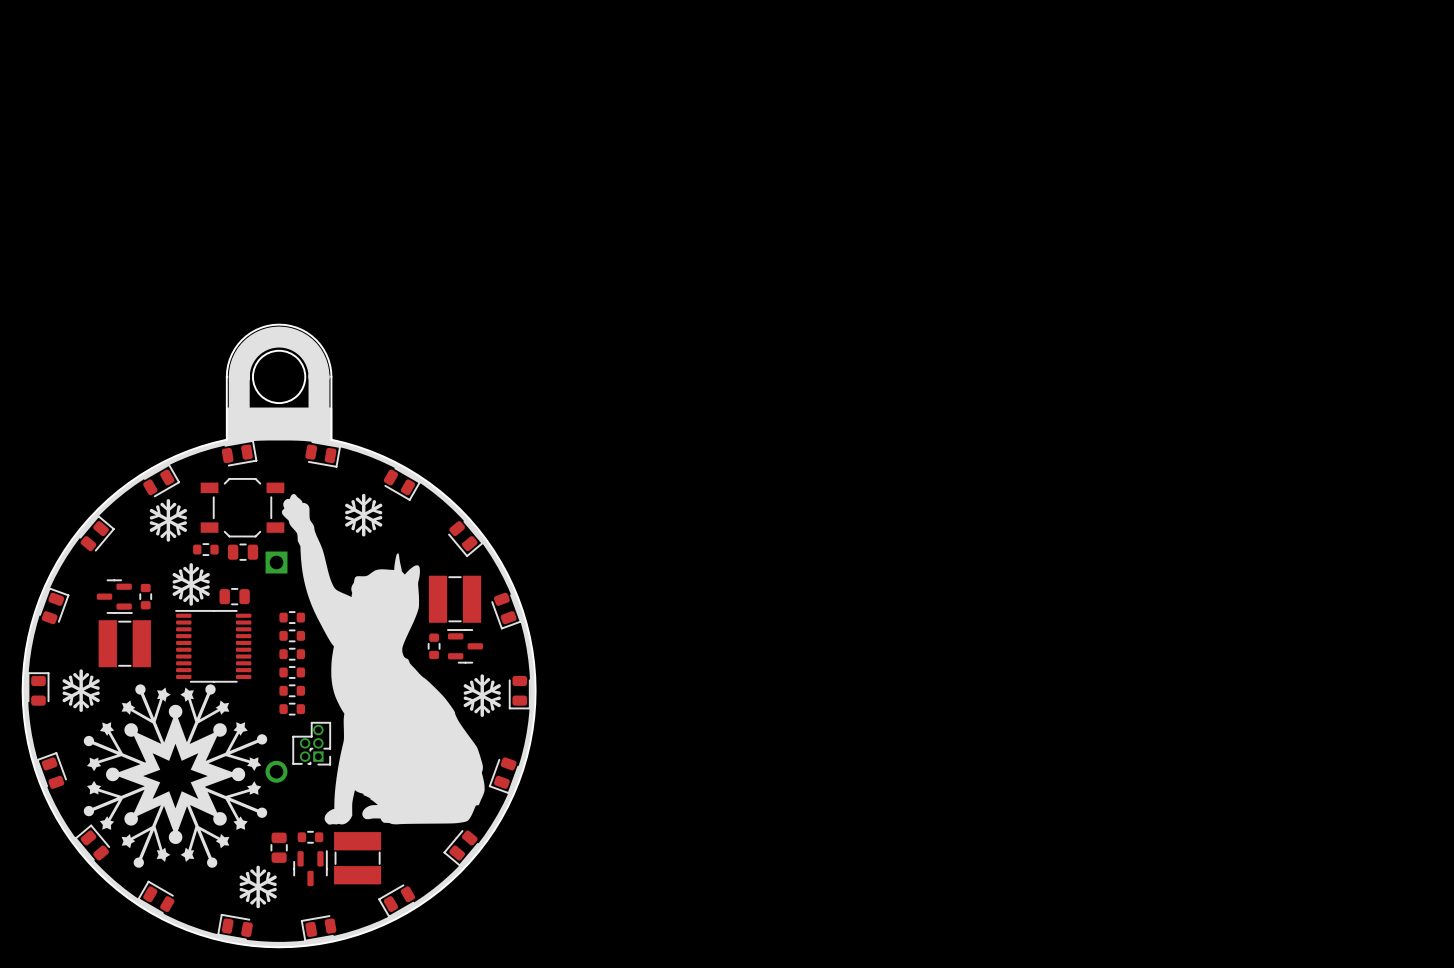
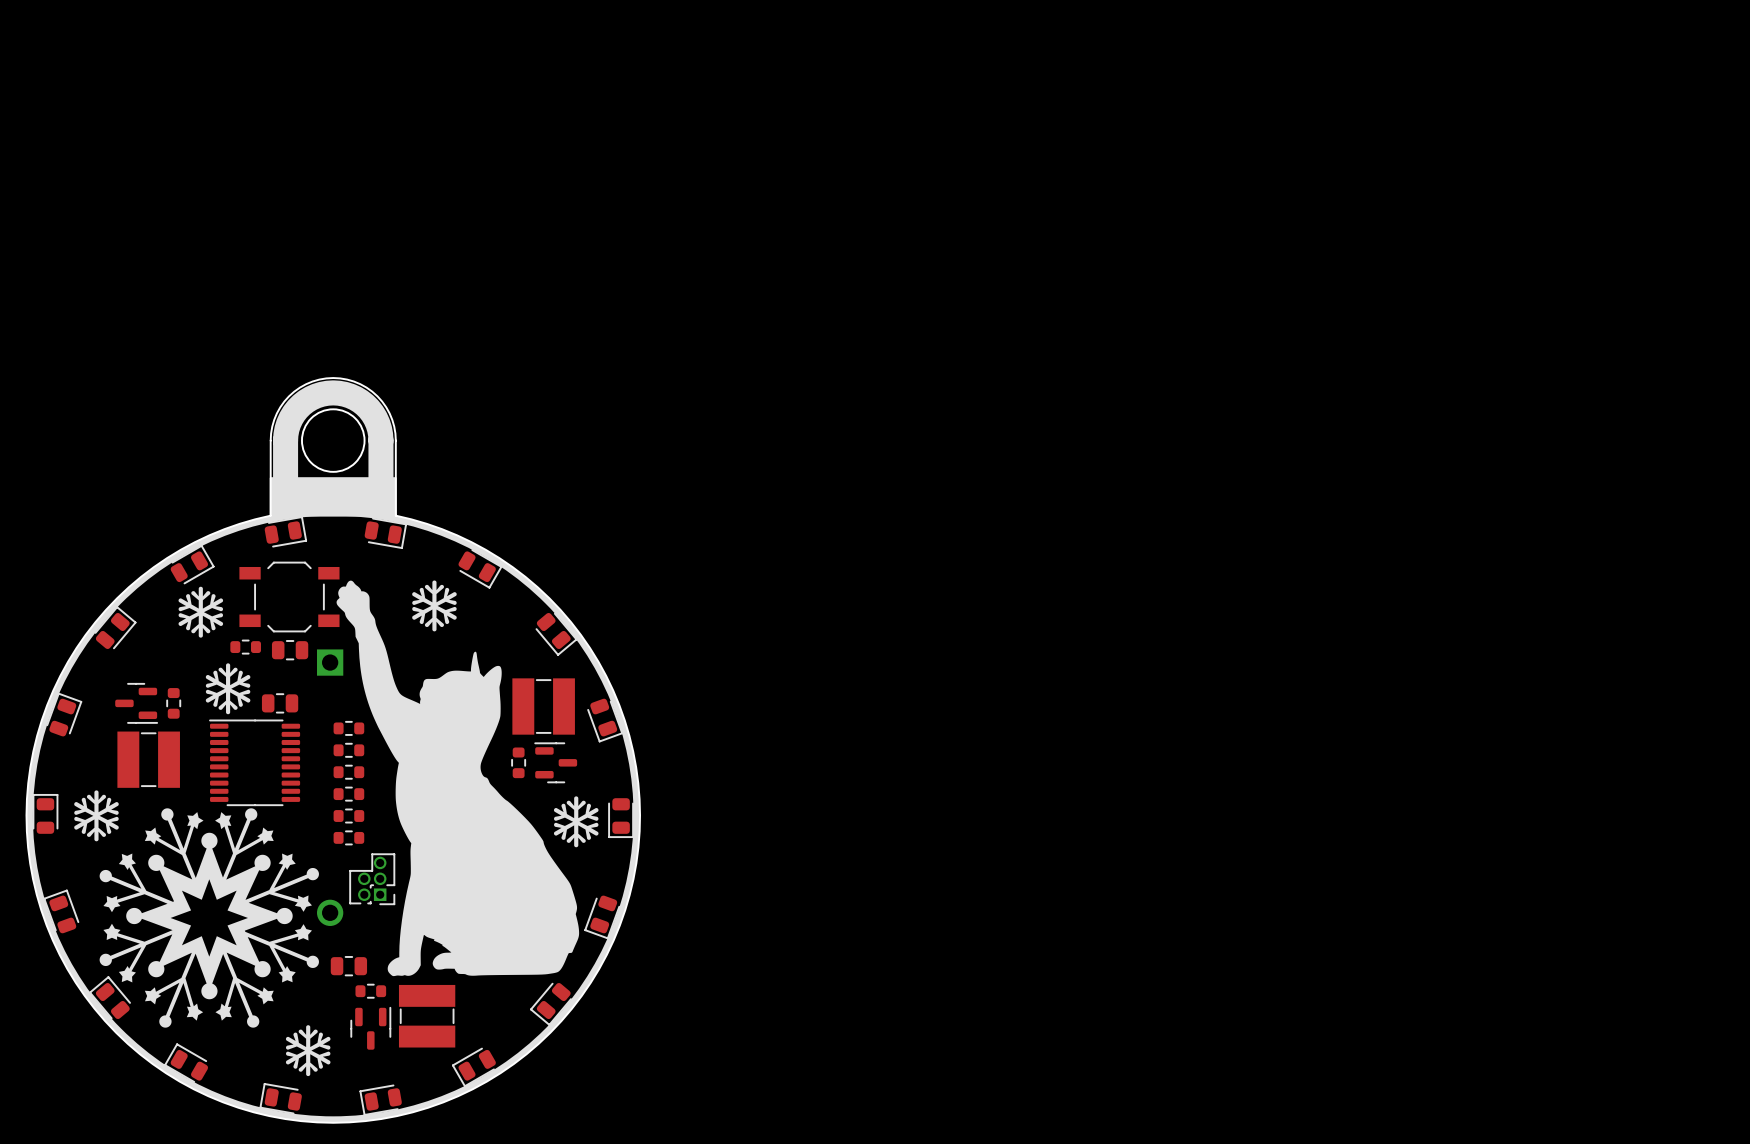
part rotation: 0° (279, 847) -> 90° clockwise (348, 966)
part position: (279, 847) -> (348, 966)

